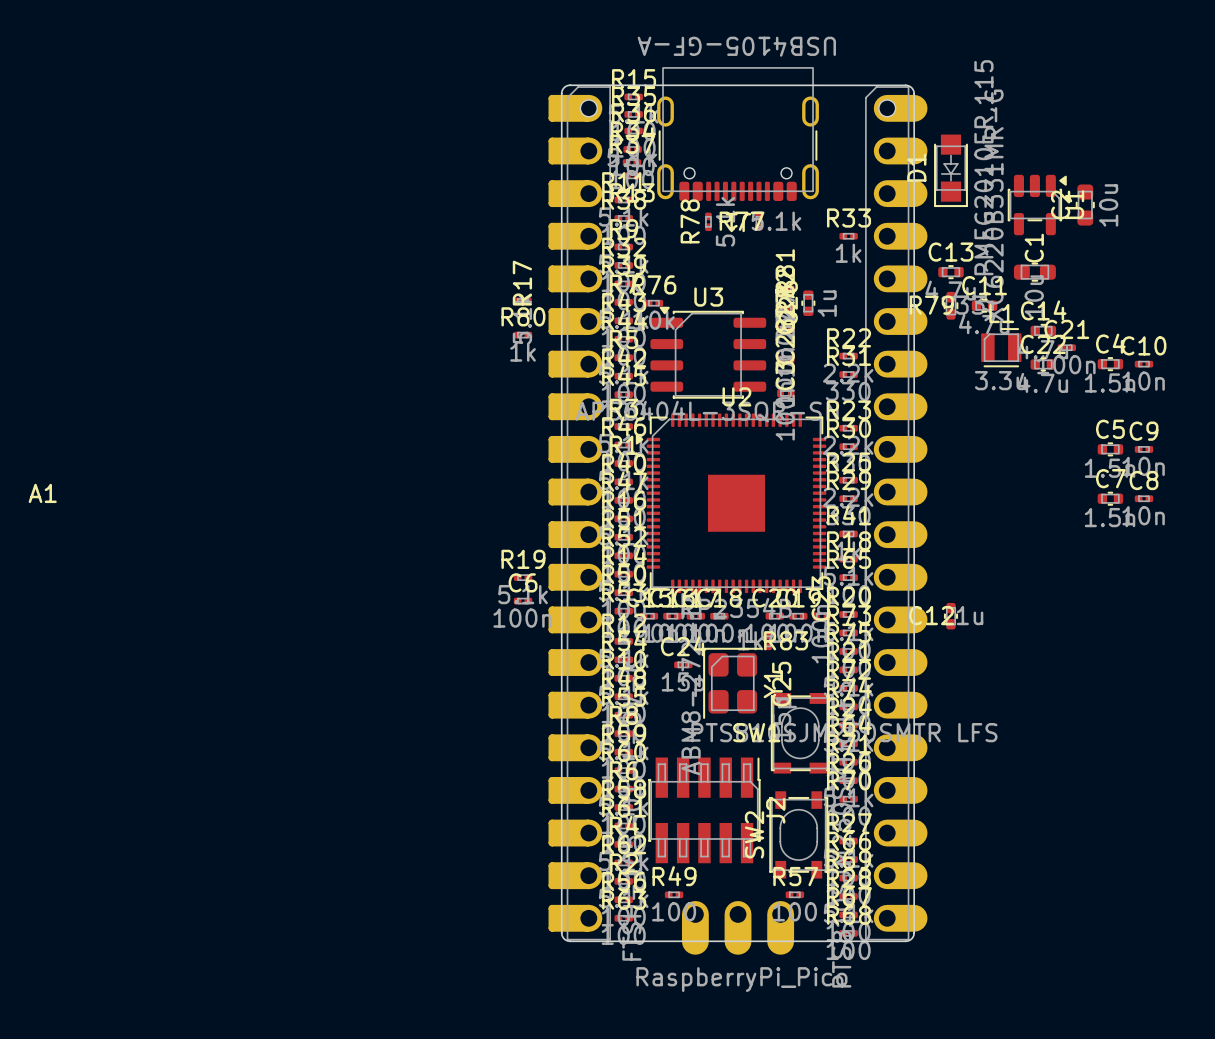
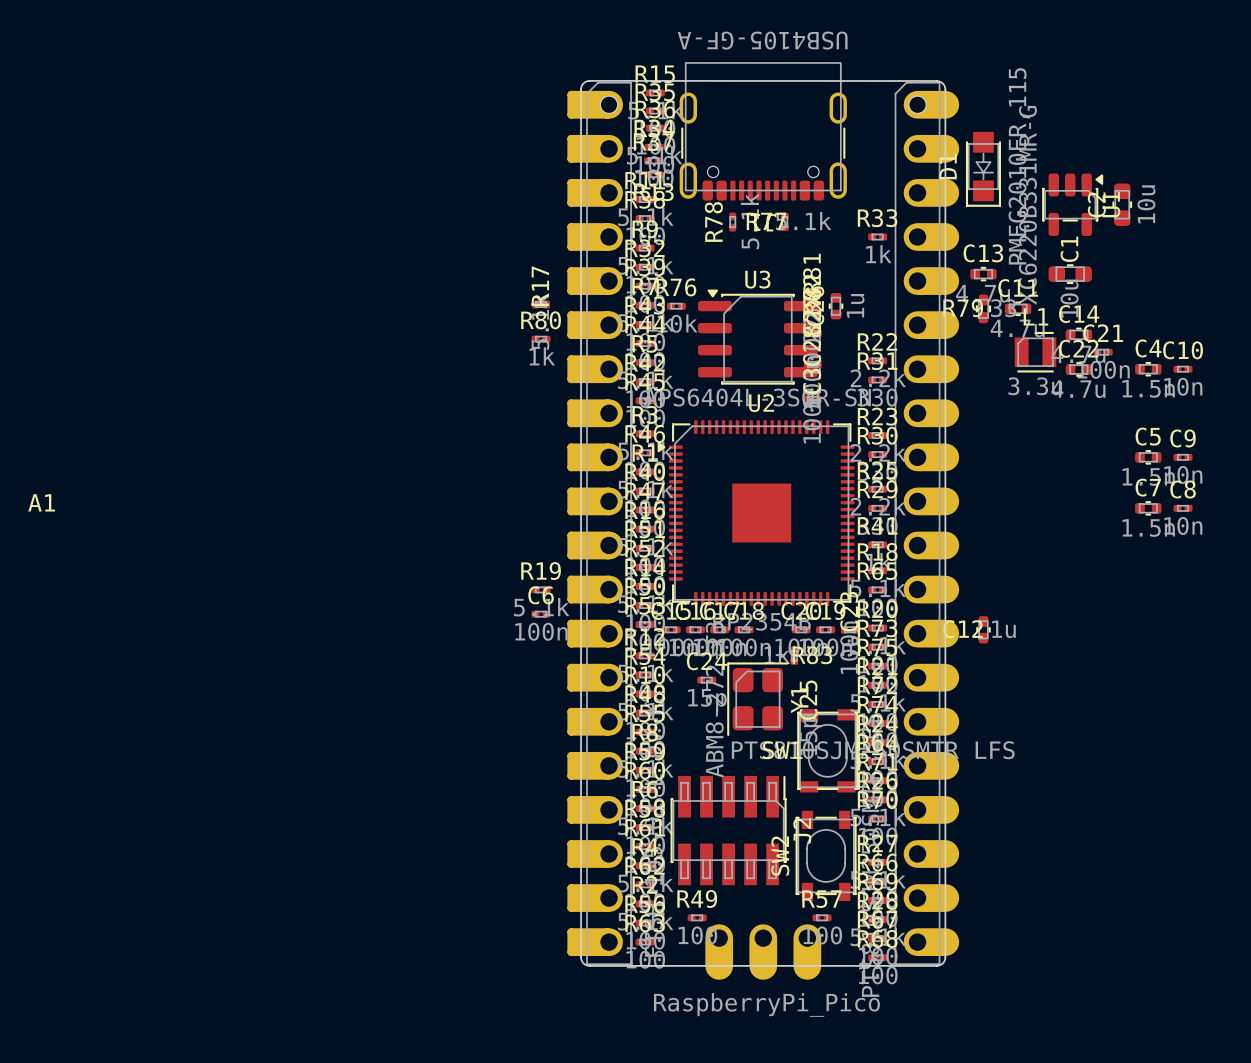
U3 position: (708, 352) -> (757, 337)

